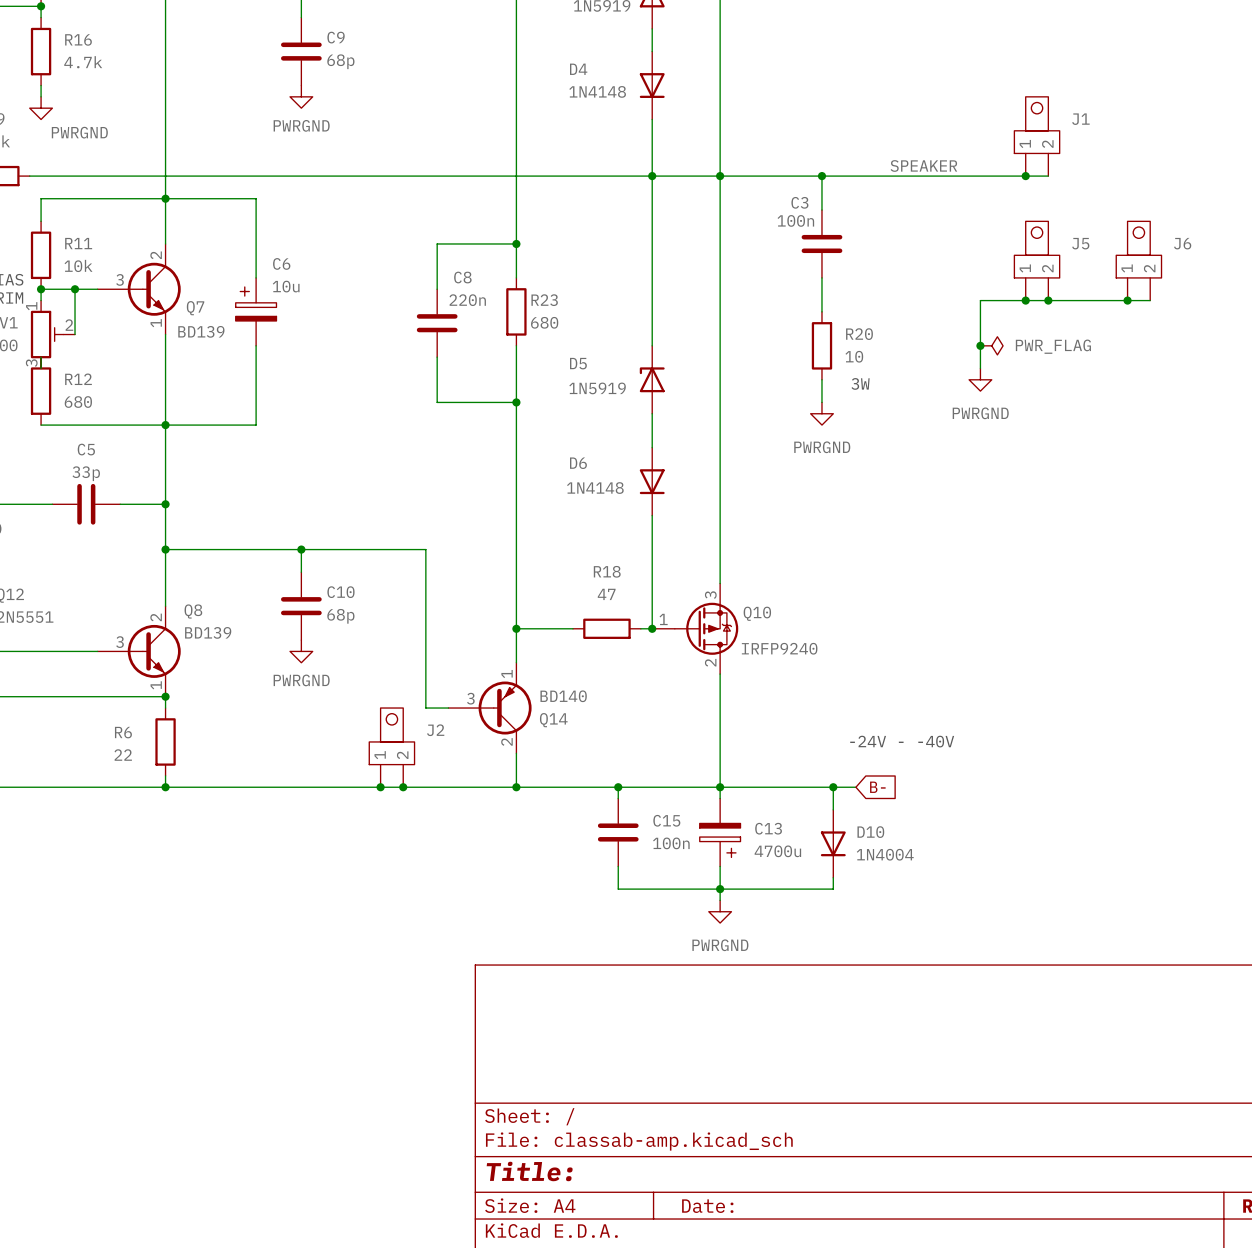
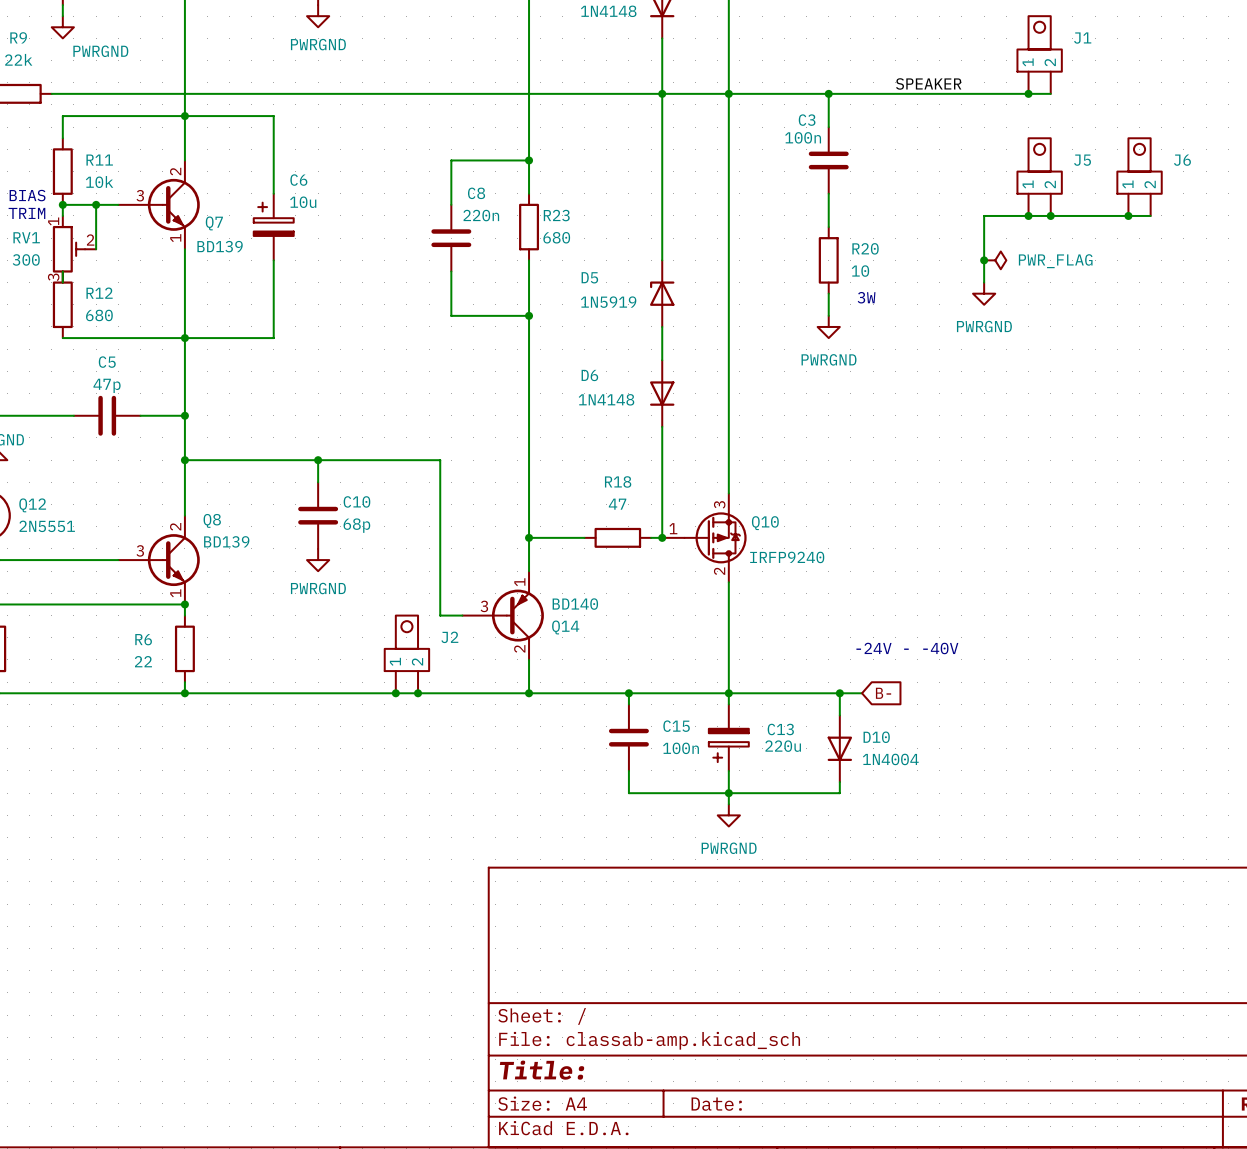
C5 value: 33p (86, 473) -> 47p (107, 385)
C13 flip: as is (720, 840) -> left-right (728, 745)
C13 value: 4700u (777, 851) -> 220u (783, 746)

